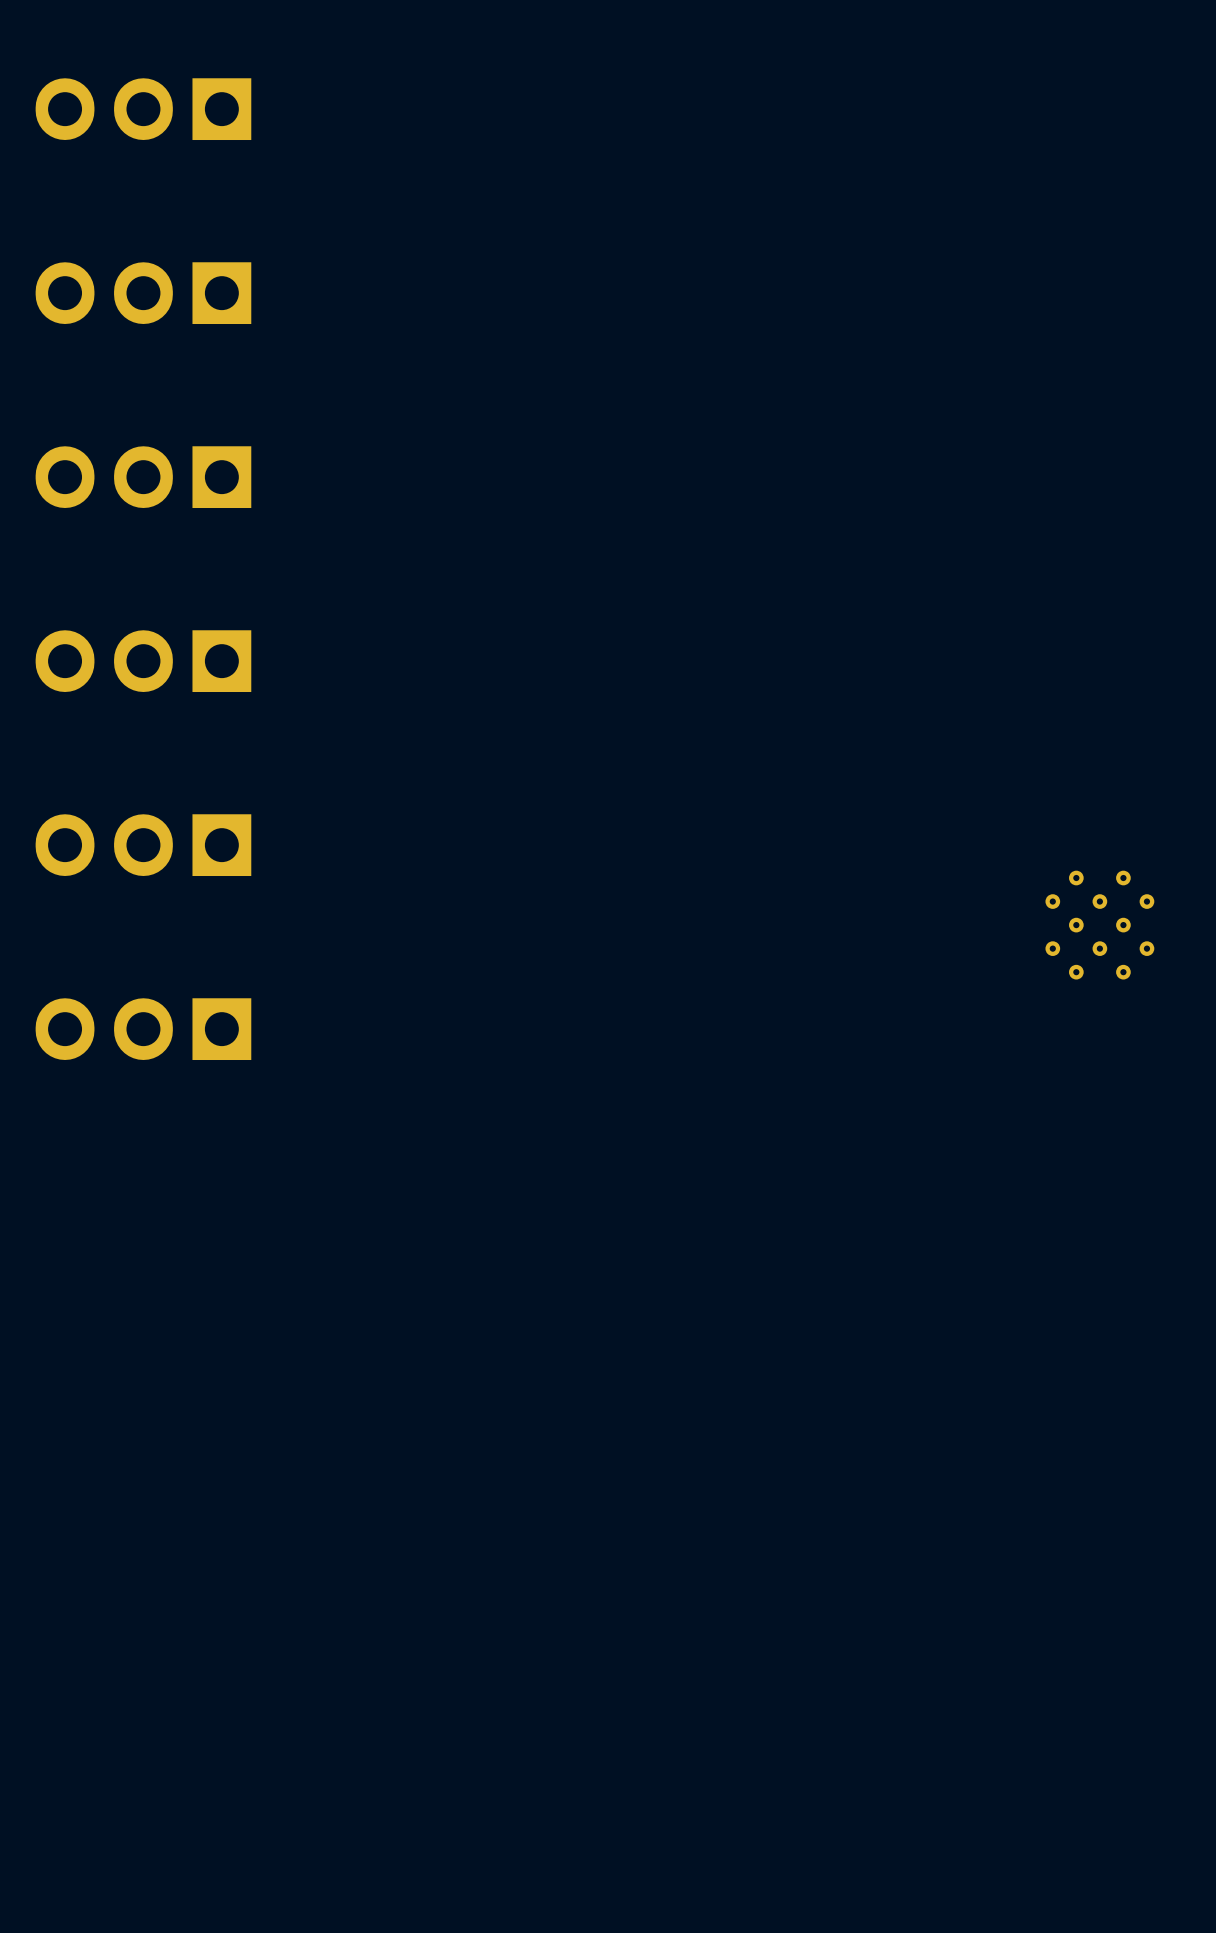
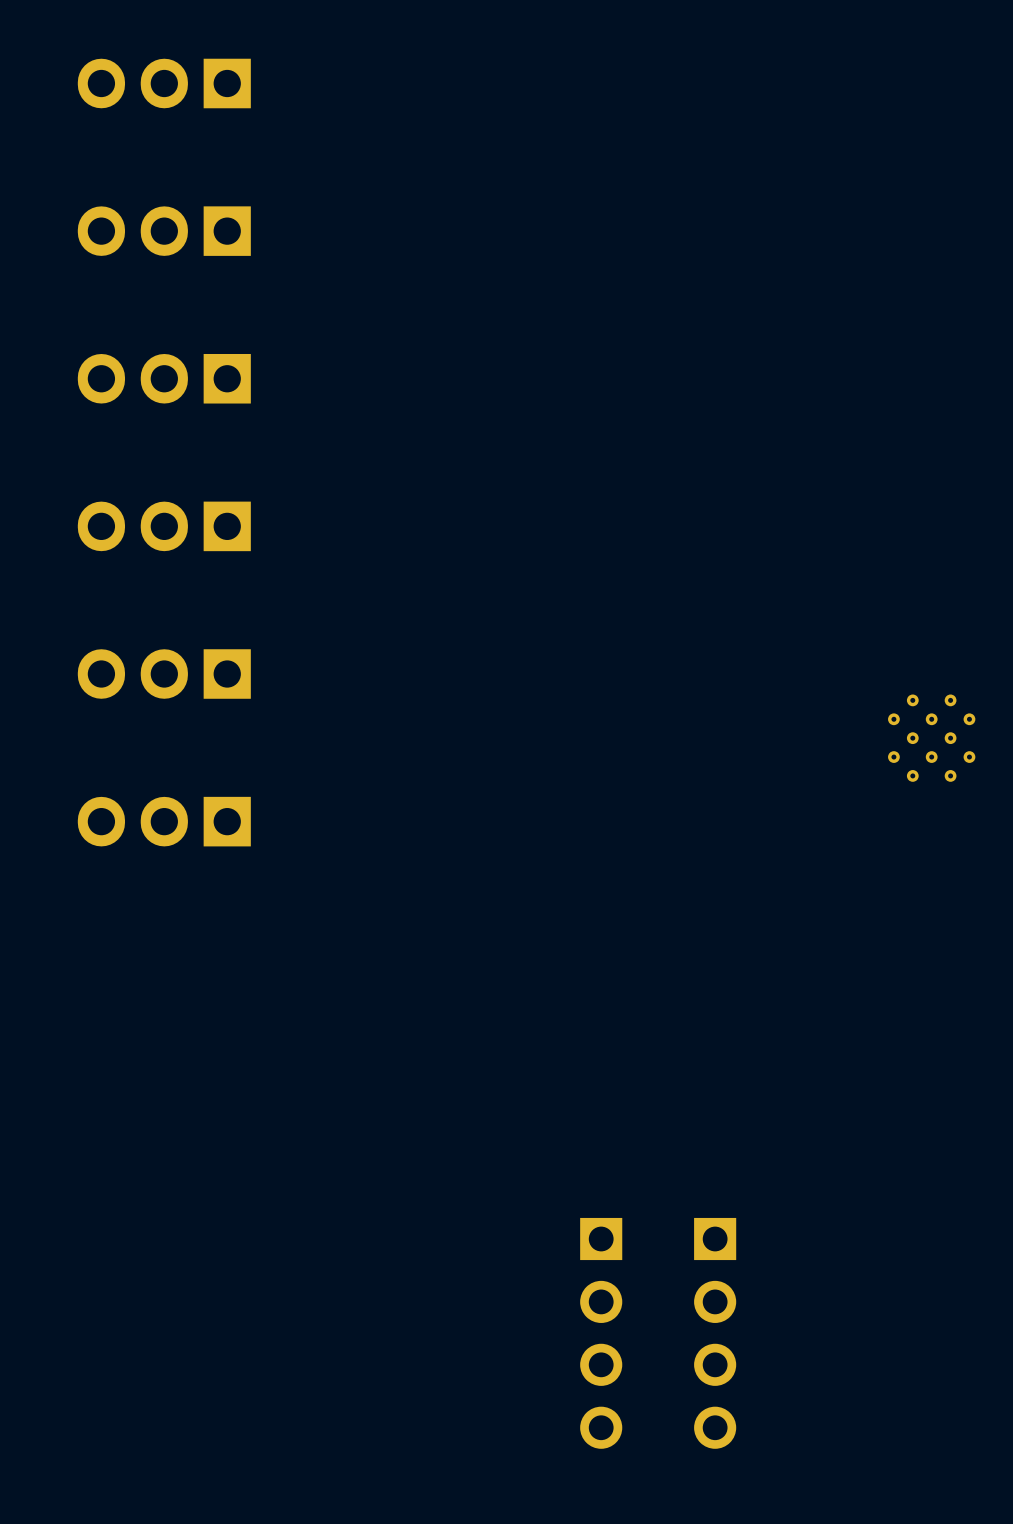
part: none -> (601, 1333)
part: none -> (715, 1333)

